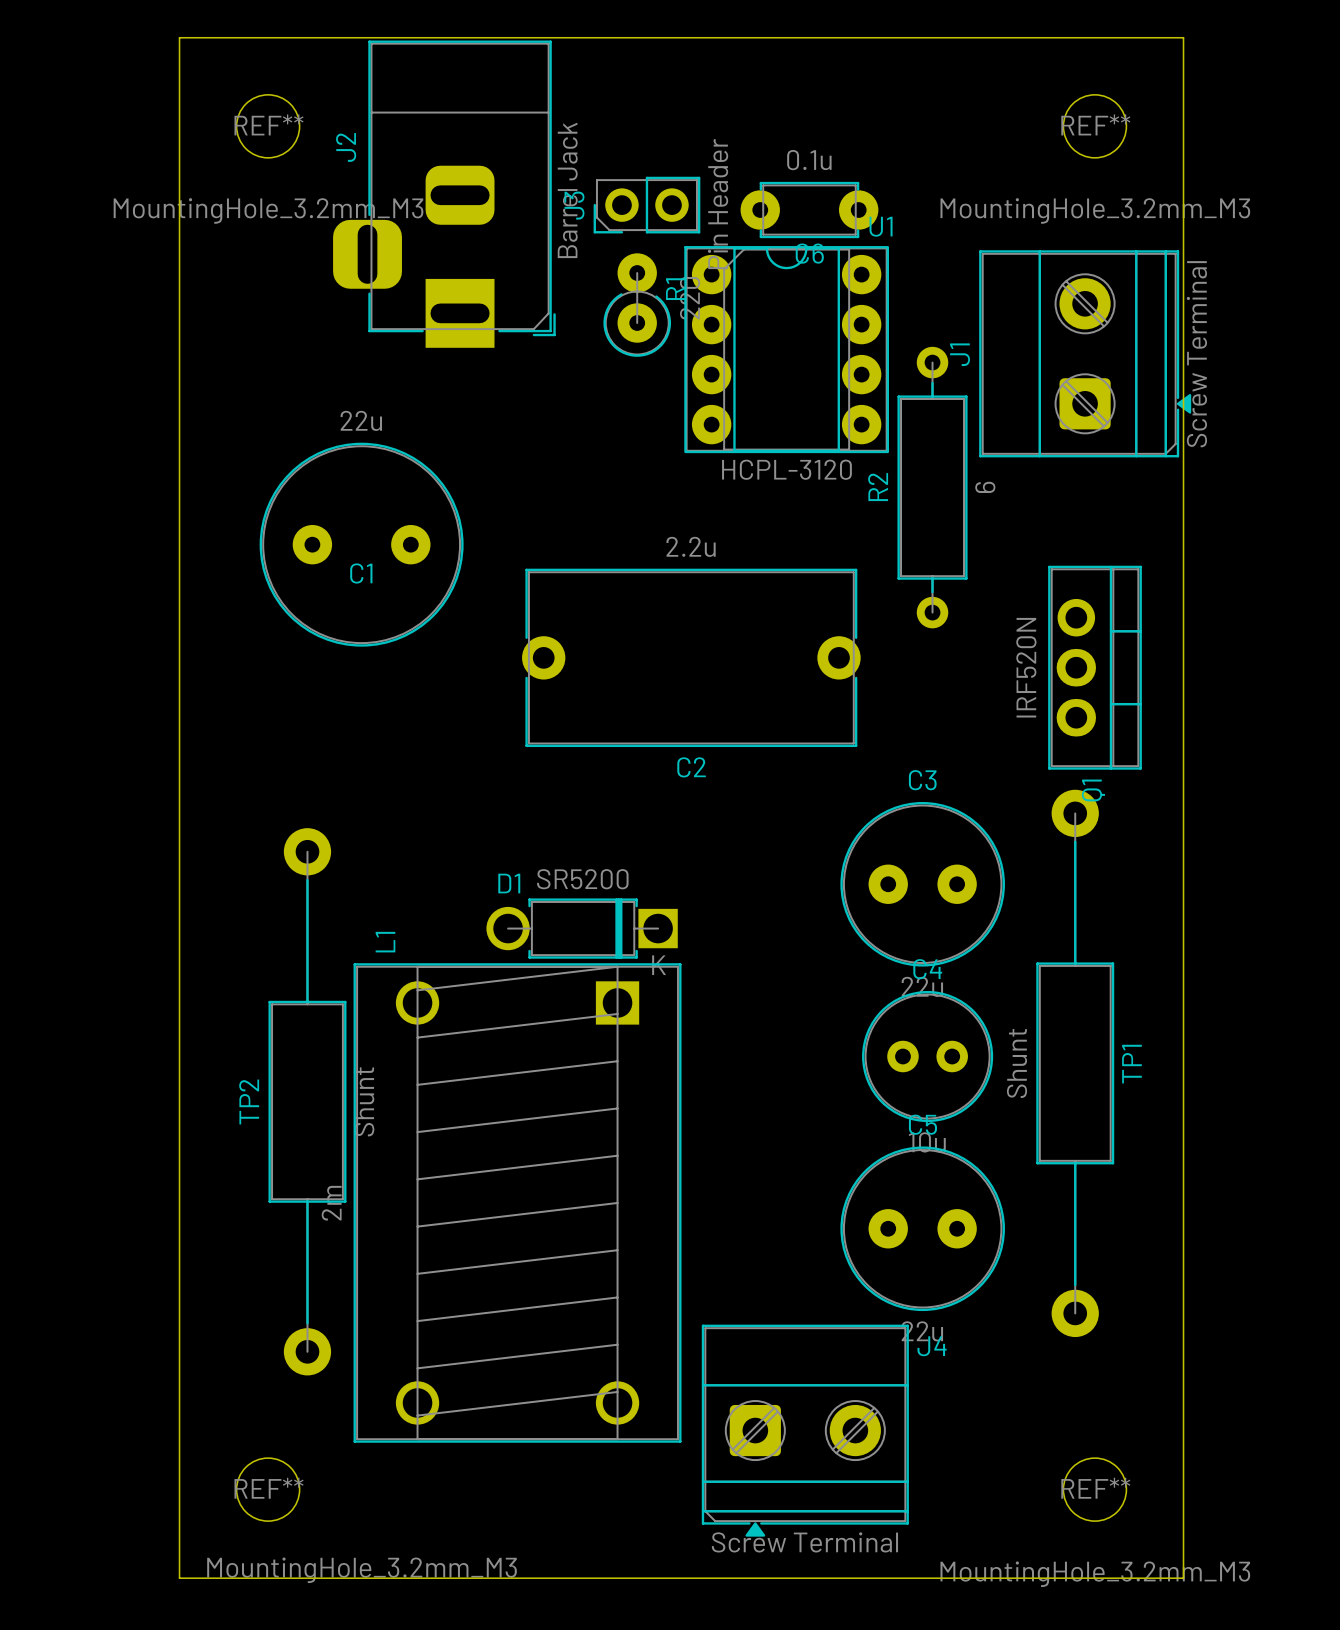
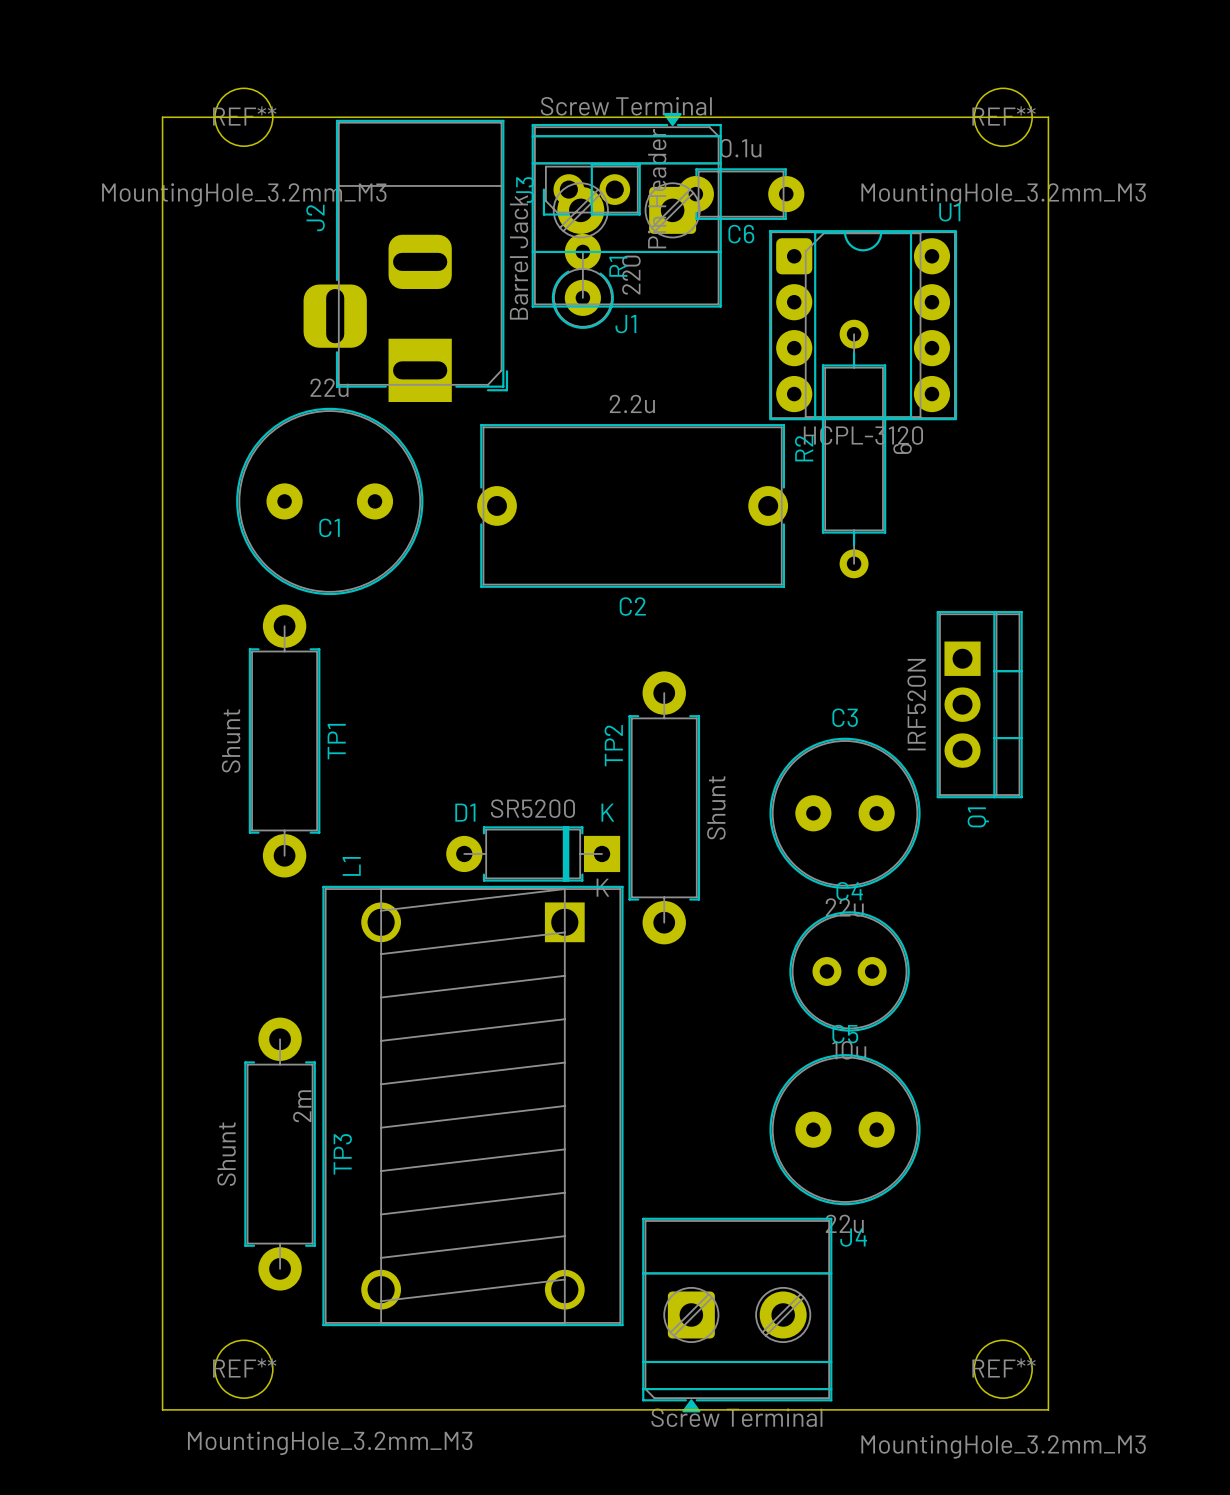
board edge: (179, 126) (179, 37) (1183, 37) (1183, 1578) (179, 1578) (179, 1533) -> (162, 117) (1048, 117) (1048, 1409) (162, 1409)
J2 position: (444, 194) -> (405, 260)
U1 footprint: [684, 246, 890, 454] -> [769, 230, 958, 421]
J1 rotation: 0° (1085, 353) -> 90° counterclockwise (626, 210)
J1 position: (1085, 353) -> (626, 210)
Q1 footprint: [1048, 565, 1142, 770] -> [936, 610, 1023, 799]
C2 position: (691, 657) -> (632, 505)
TP1 footprint: [1036, 789, 1115, 1338] -> [248, 604, 321, 878]
TP2 footprint: [268, 828, 347, 1376] -> [628, 671, 701, 945]
D1 footprint: [486, 898, 678, 959] -> [446, 826, 621, 882]
TP2 name position: TP2 (249, 1102) -> TP2 (613, 745)
TP3: none -> Shunt (280, 1154)

